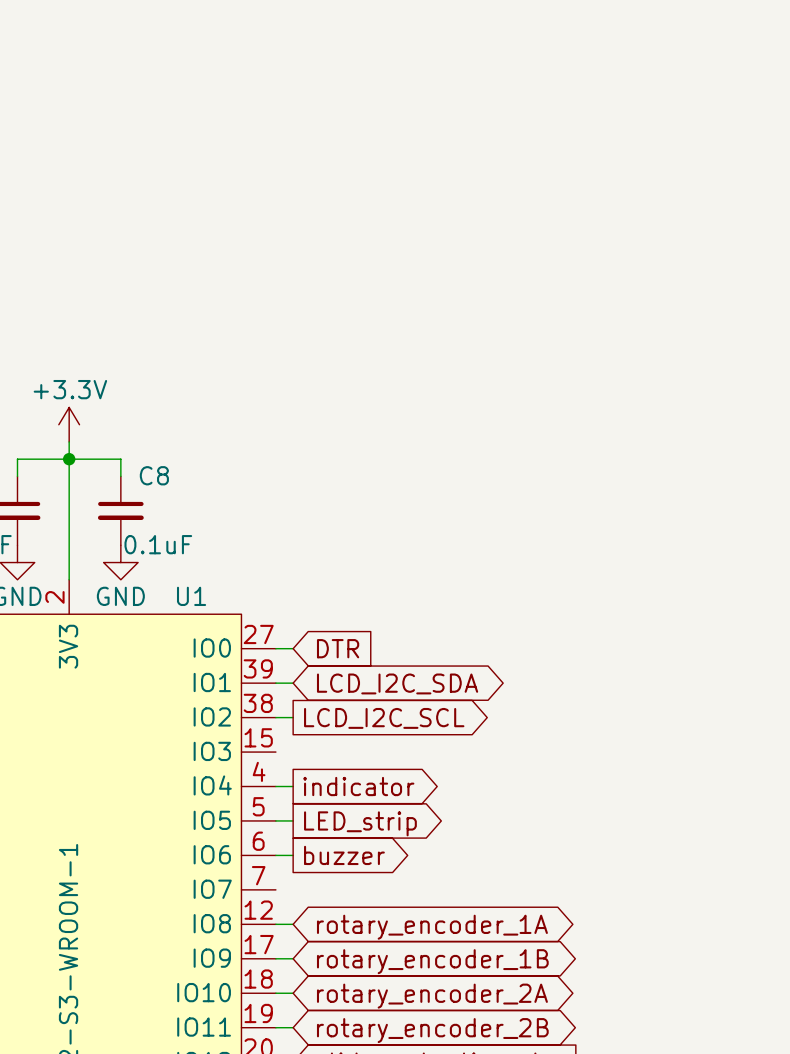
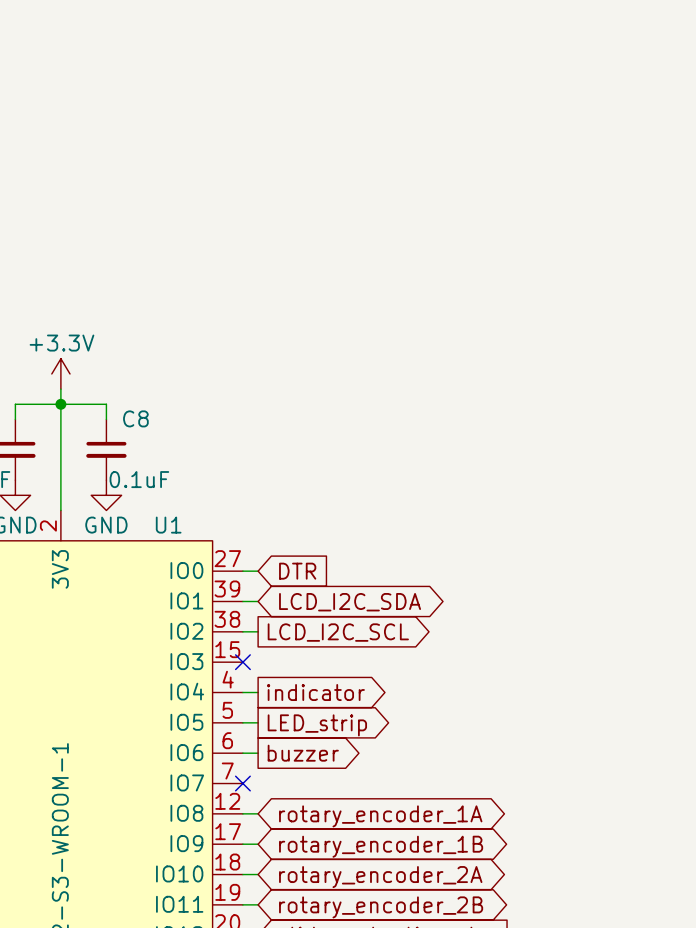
no-connect mark: none -> (242, 662)
no-connect mark: none -> (242, 783)

